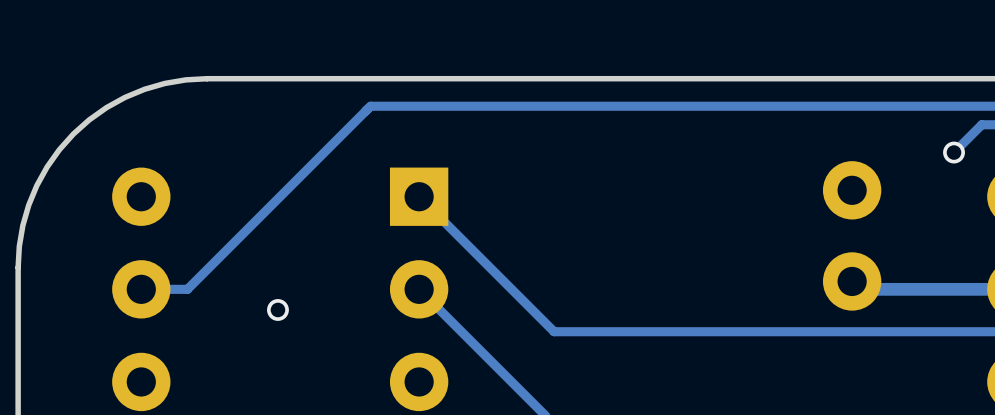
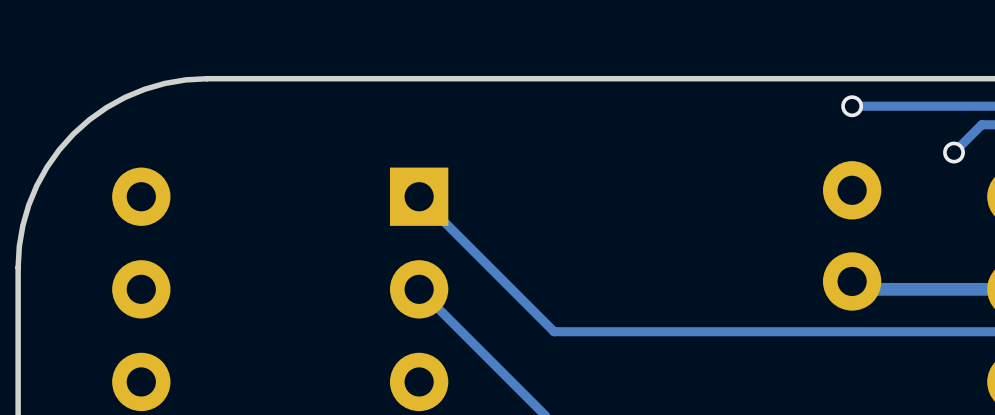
track: (852, 106) (370, 106) (187, 289) (141, 289) -> none
via: none -> (852, 106)
via: (277, 309) -> none

